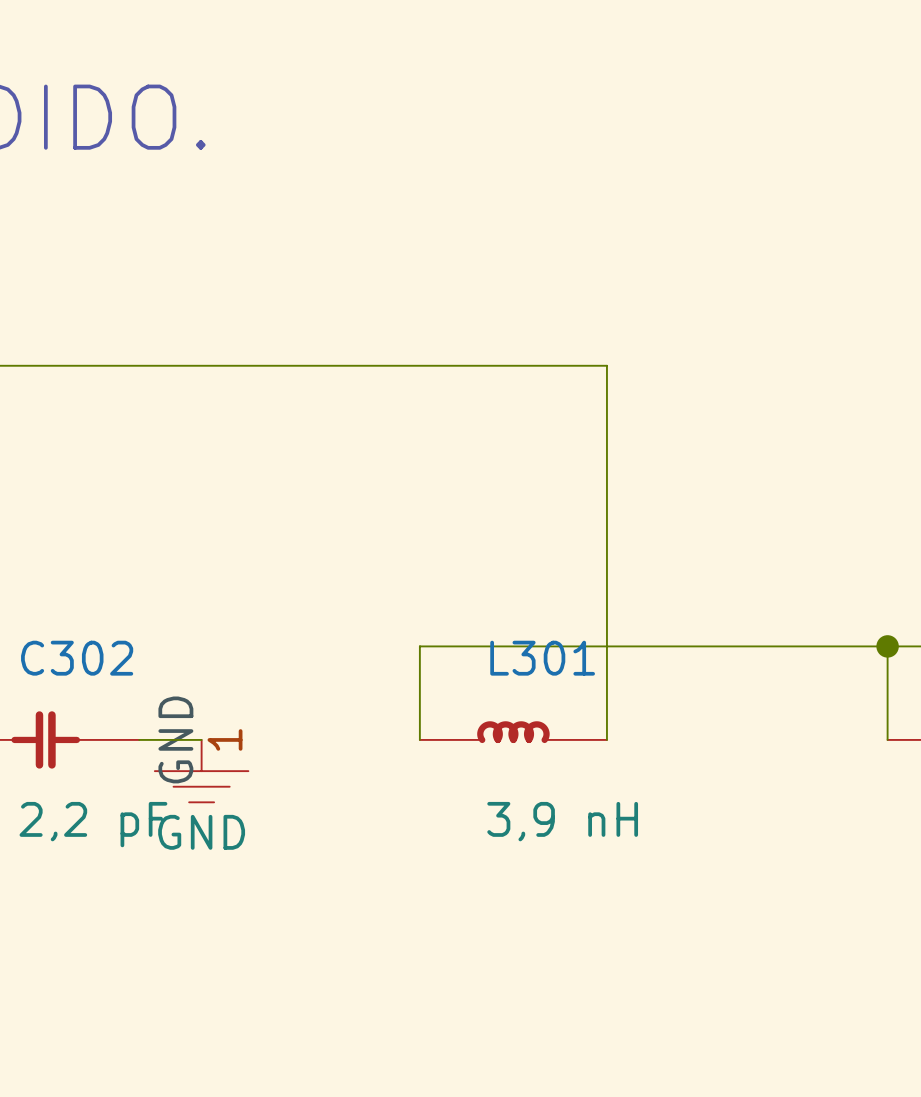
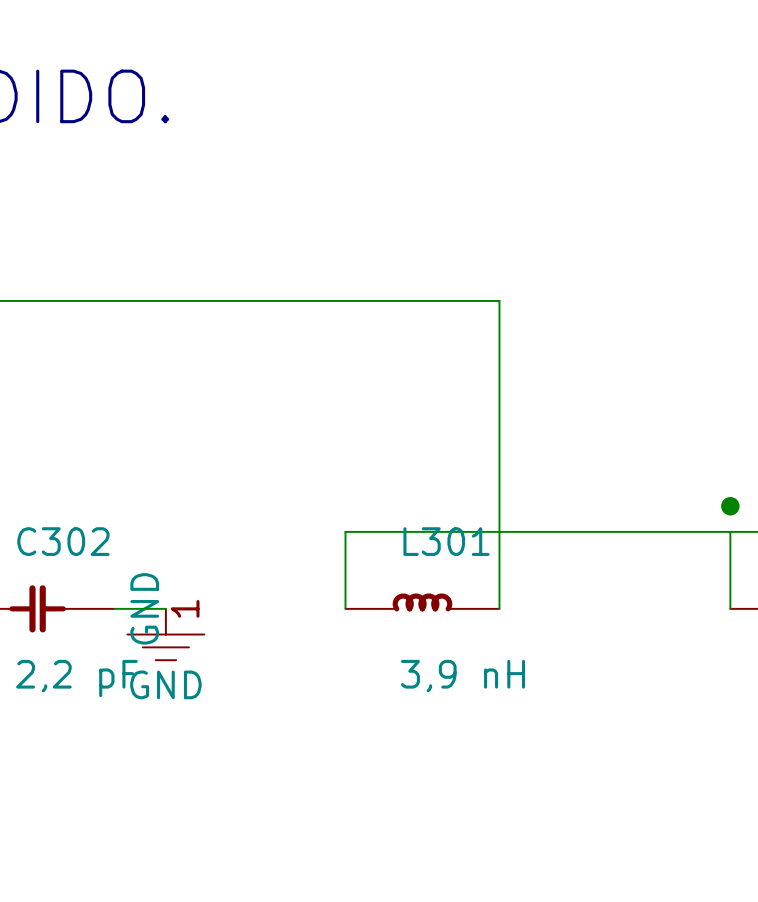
junction position: (887, 646) -> (730, 506)

